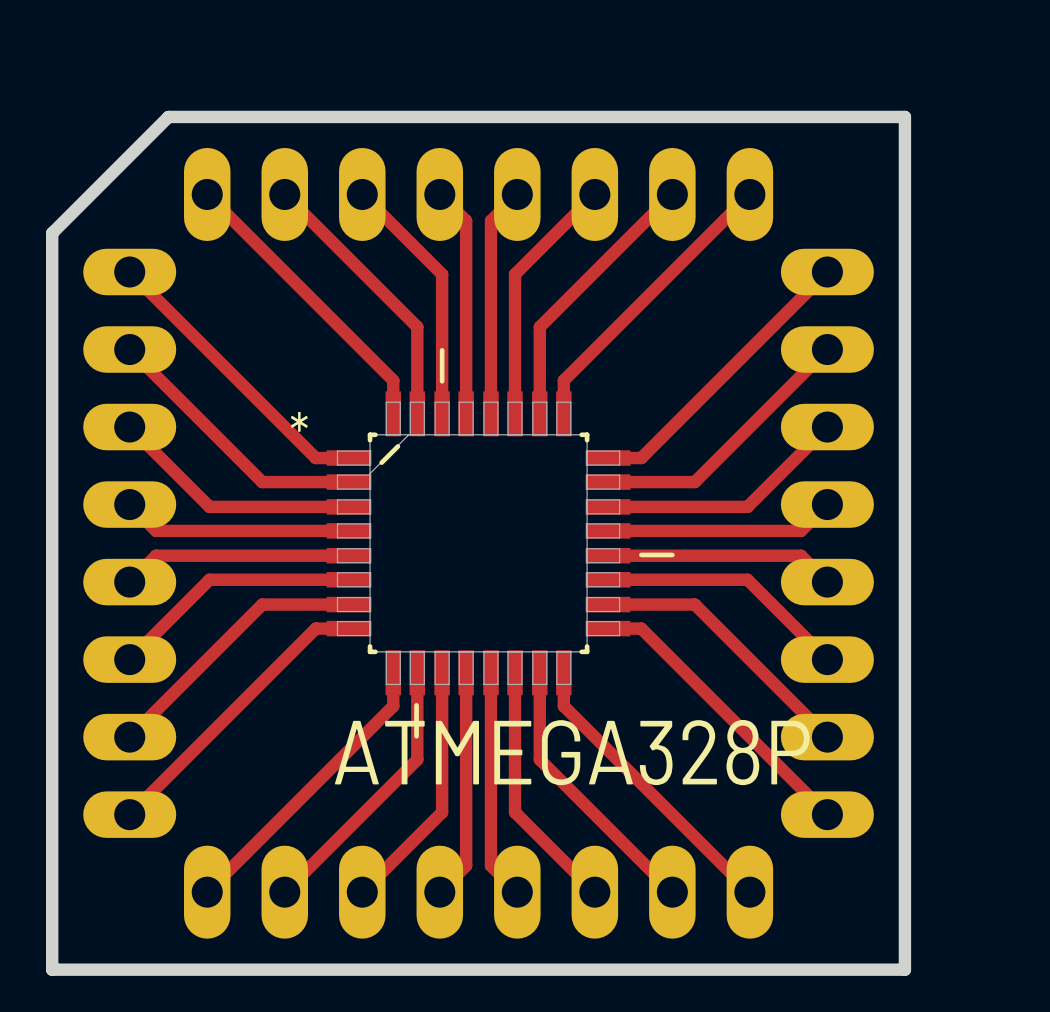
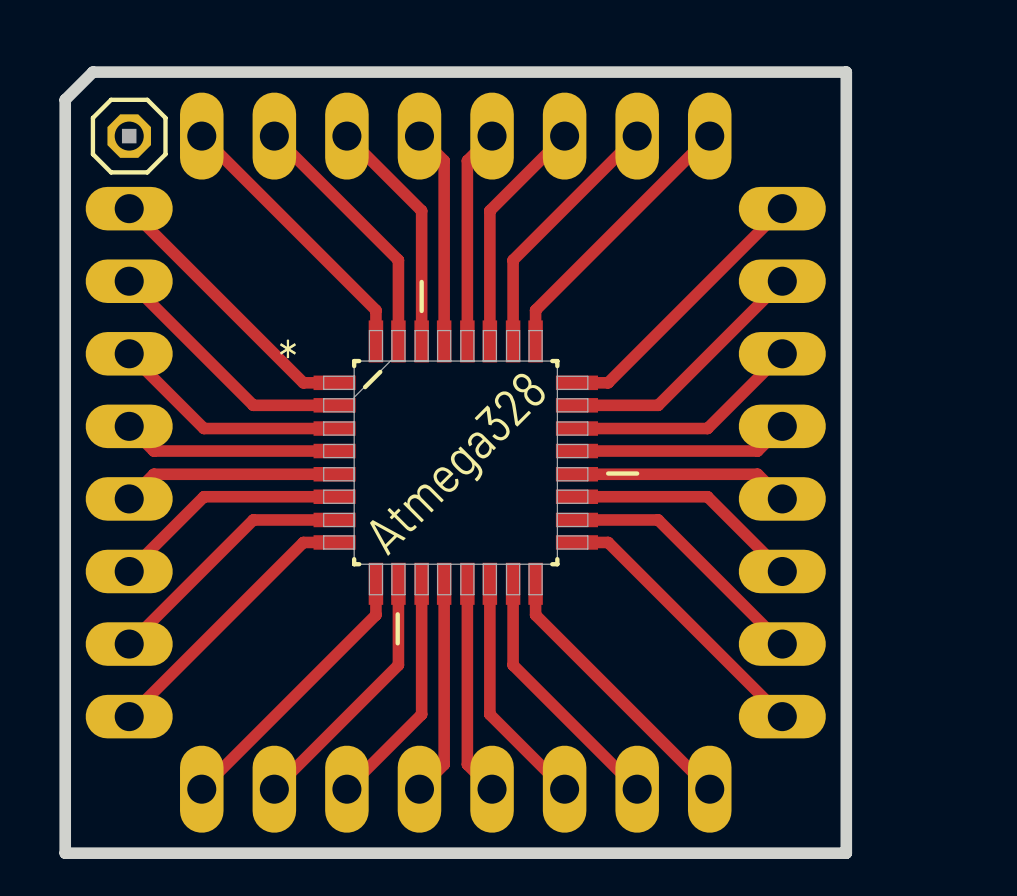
board edge: (168, 116) (52, 233) (52, 969) (904, 969) (904, 116) (168, 116) -> (92, 72) (65, 99) (65, 853) (846, 853) (846, 72) (92, 72)
part: none -> (129, 136)
text: none -> Atmega328 (457, 464)
ATMEGA328P name: ATMEGA328P (572, 752) -> none

